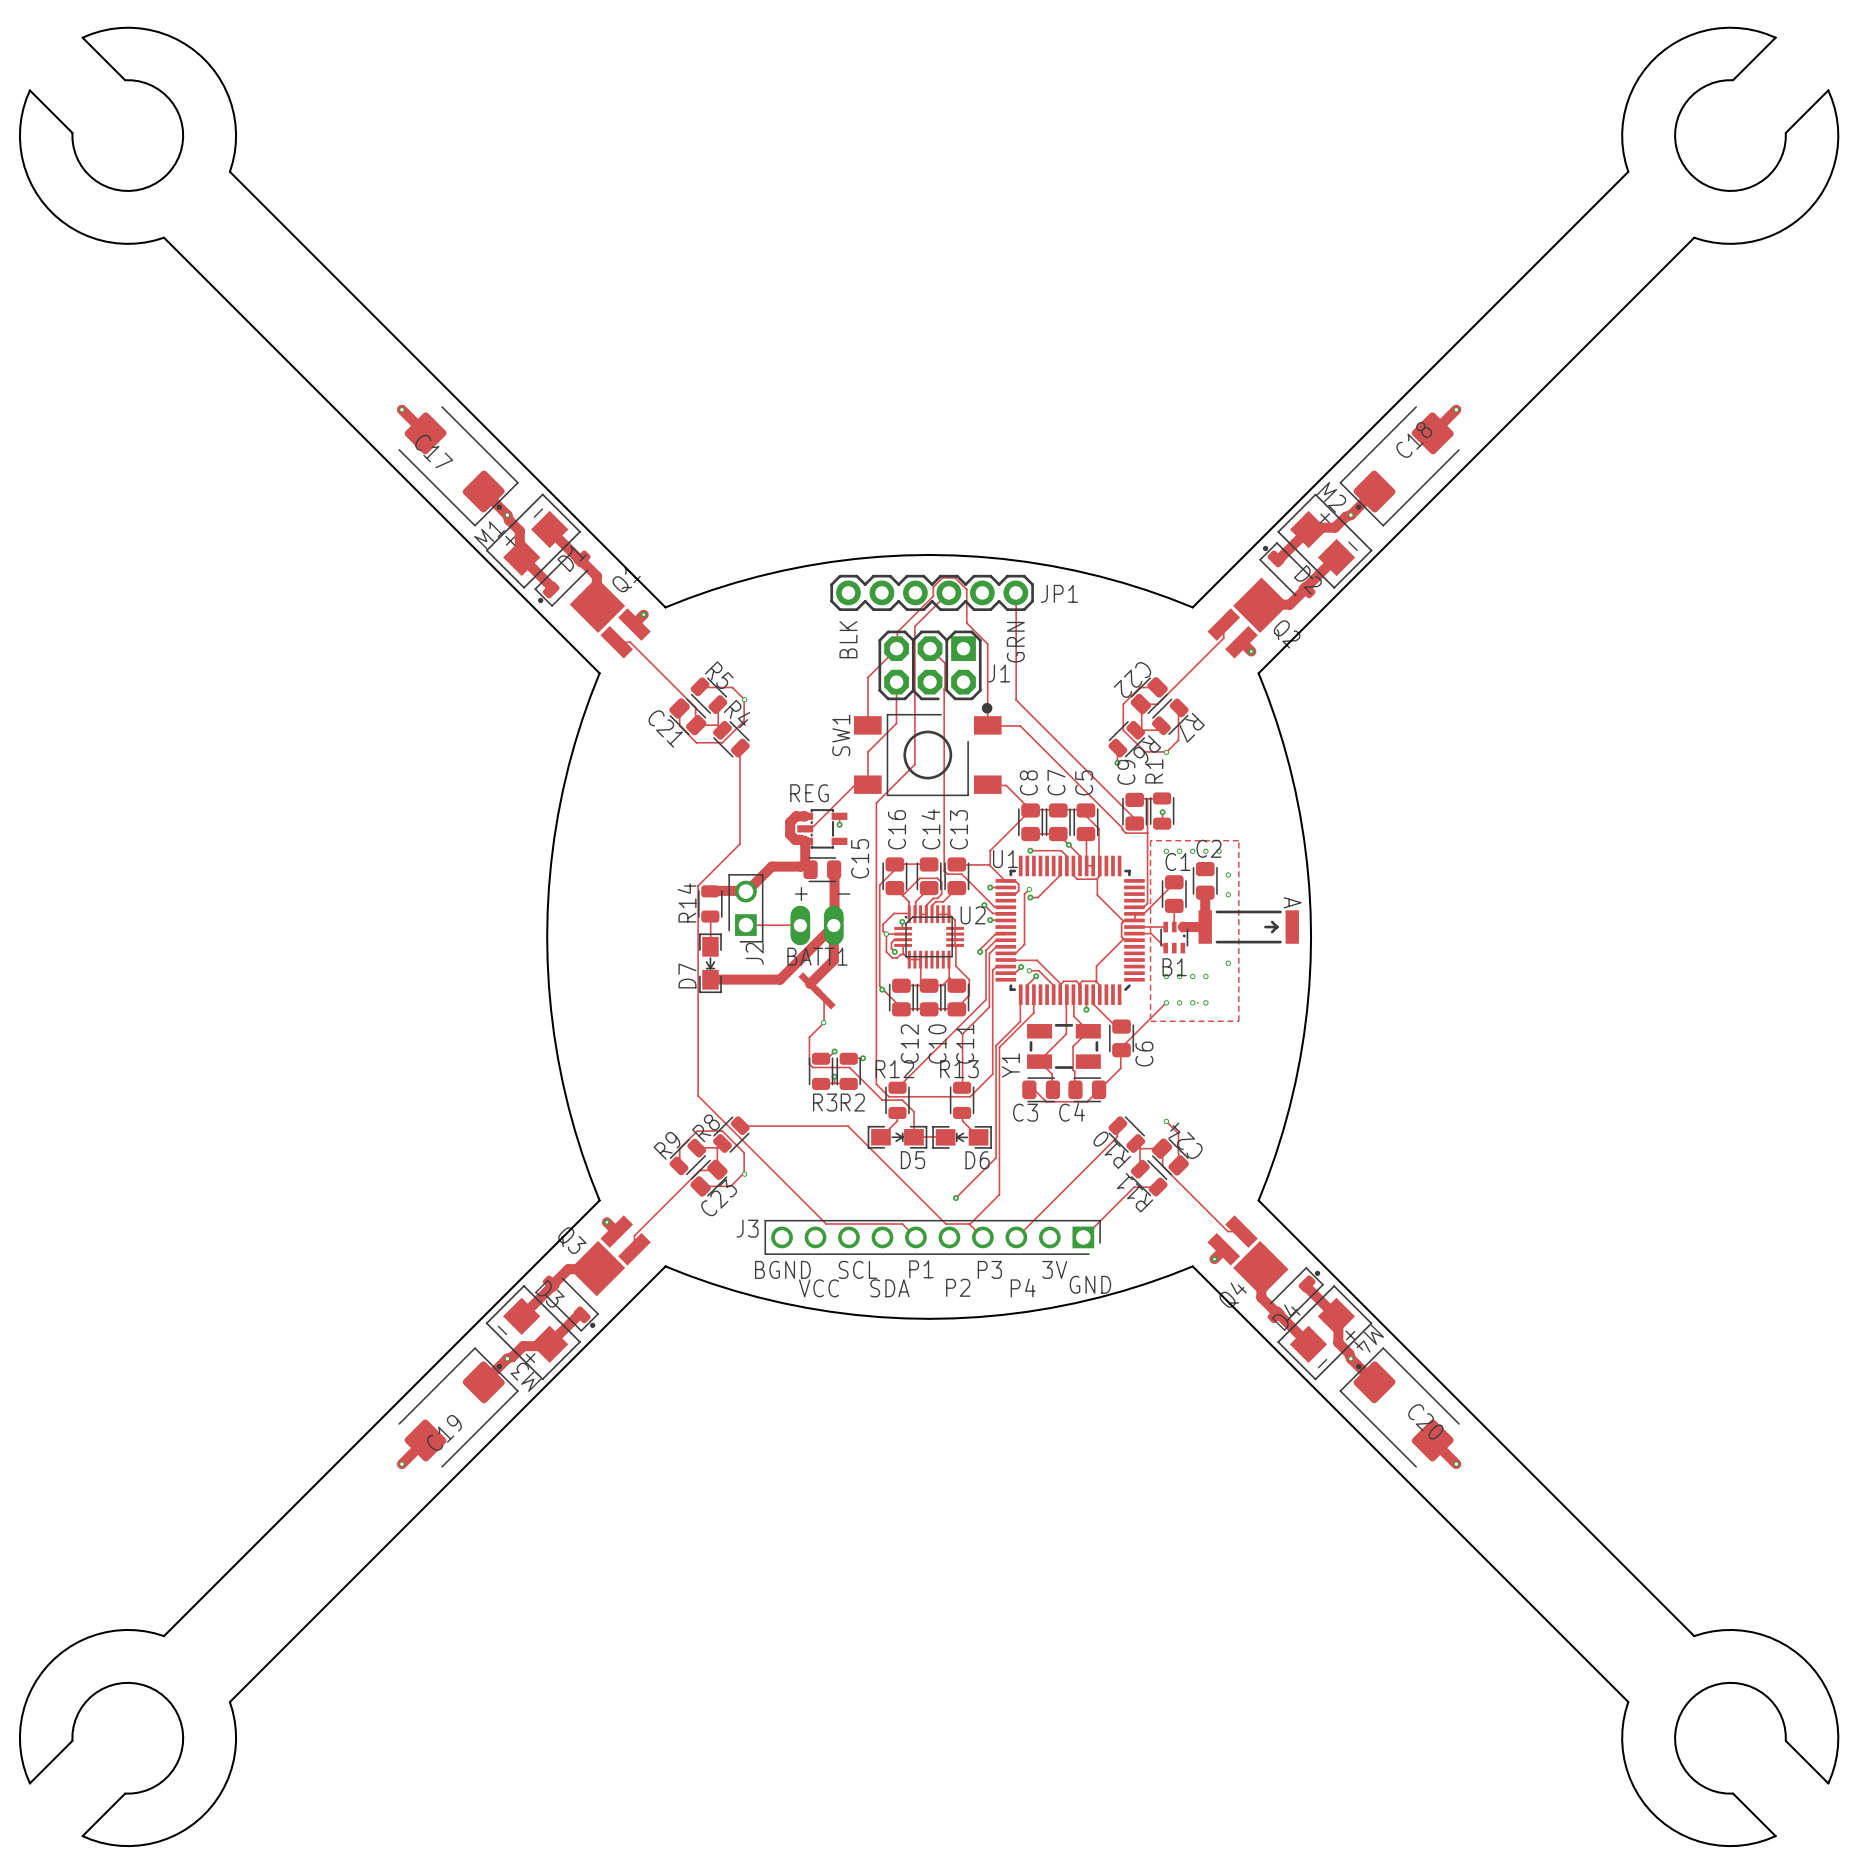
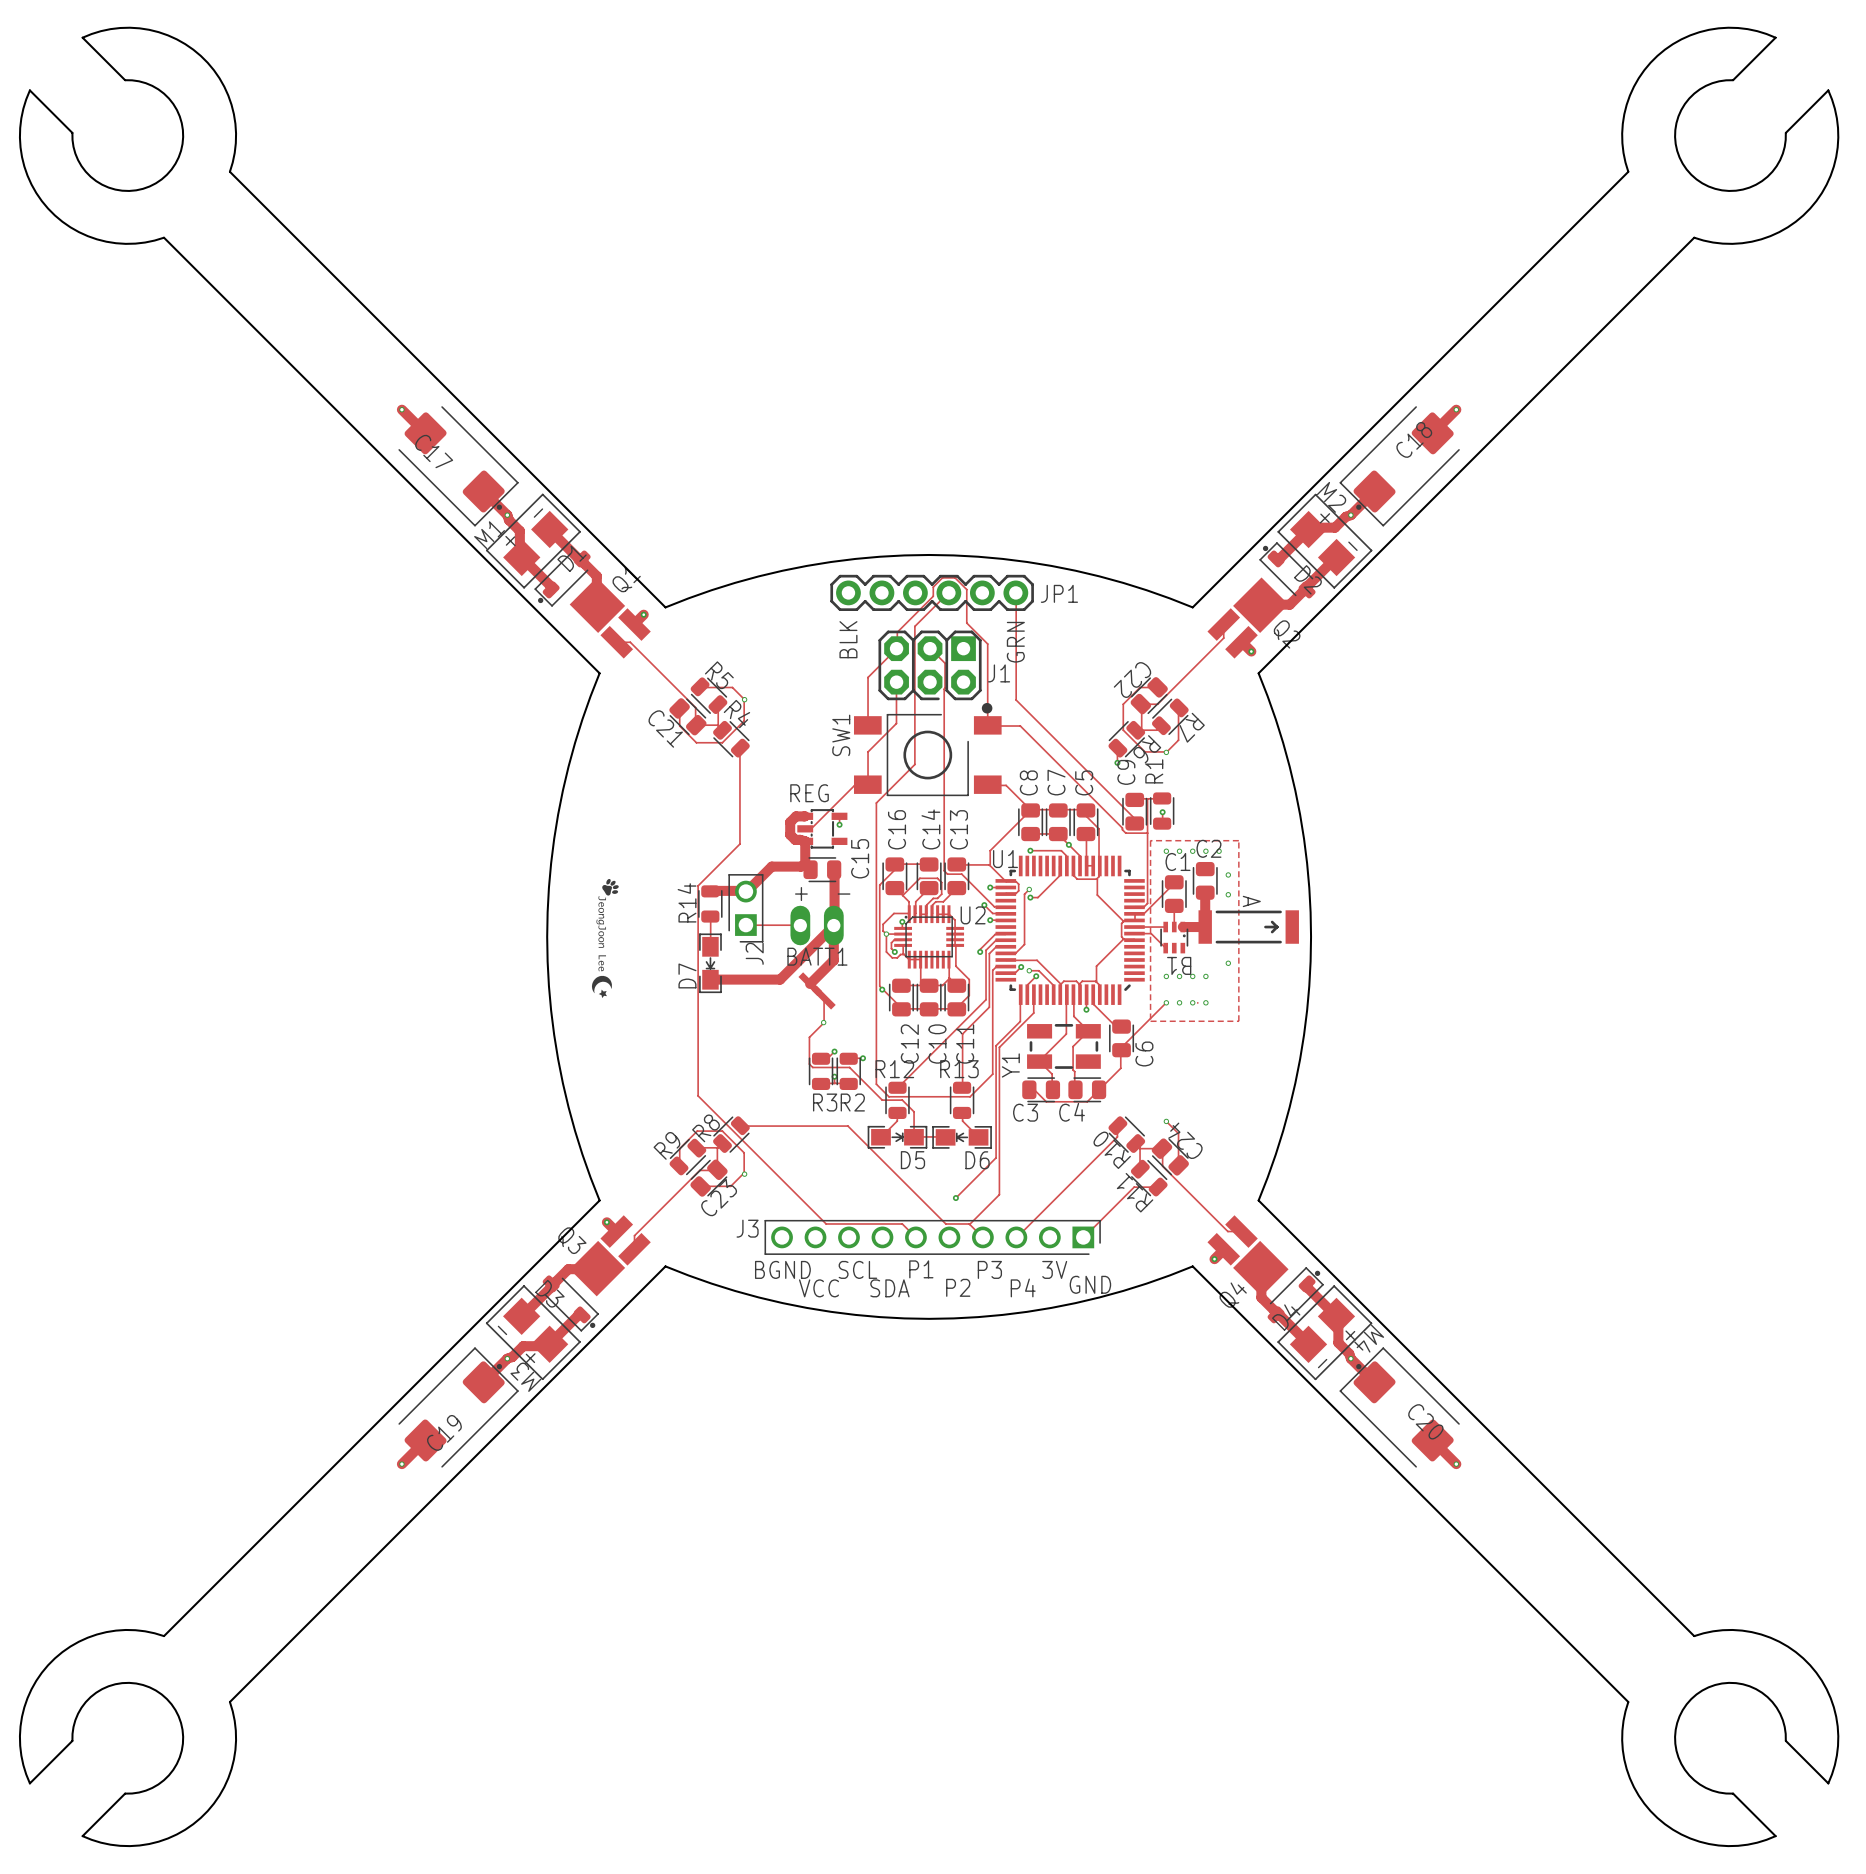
drawing: none -> [591, 879, 619, 999]
A name position: A (1292, 902) -> A (1251, 901)
B1 name rotation: 0° (1174, 967) -> 180° (1179, 965)

